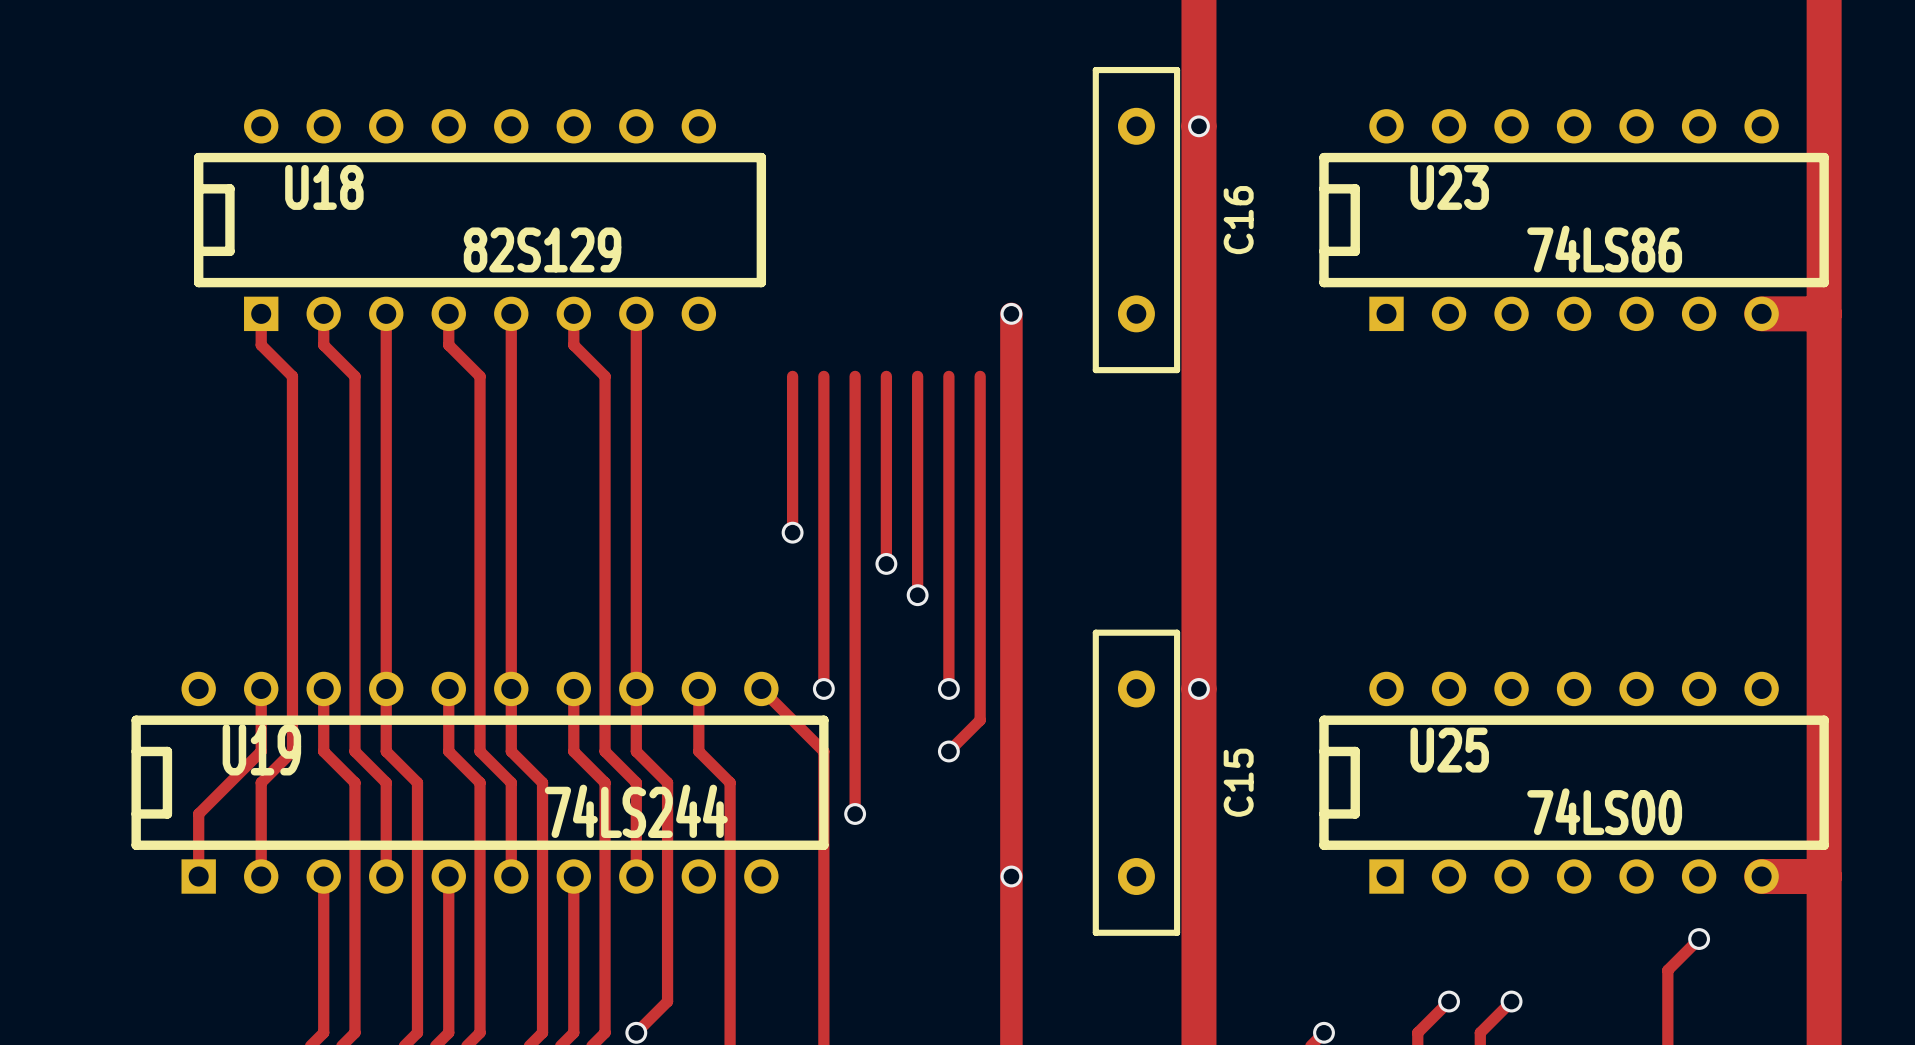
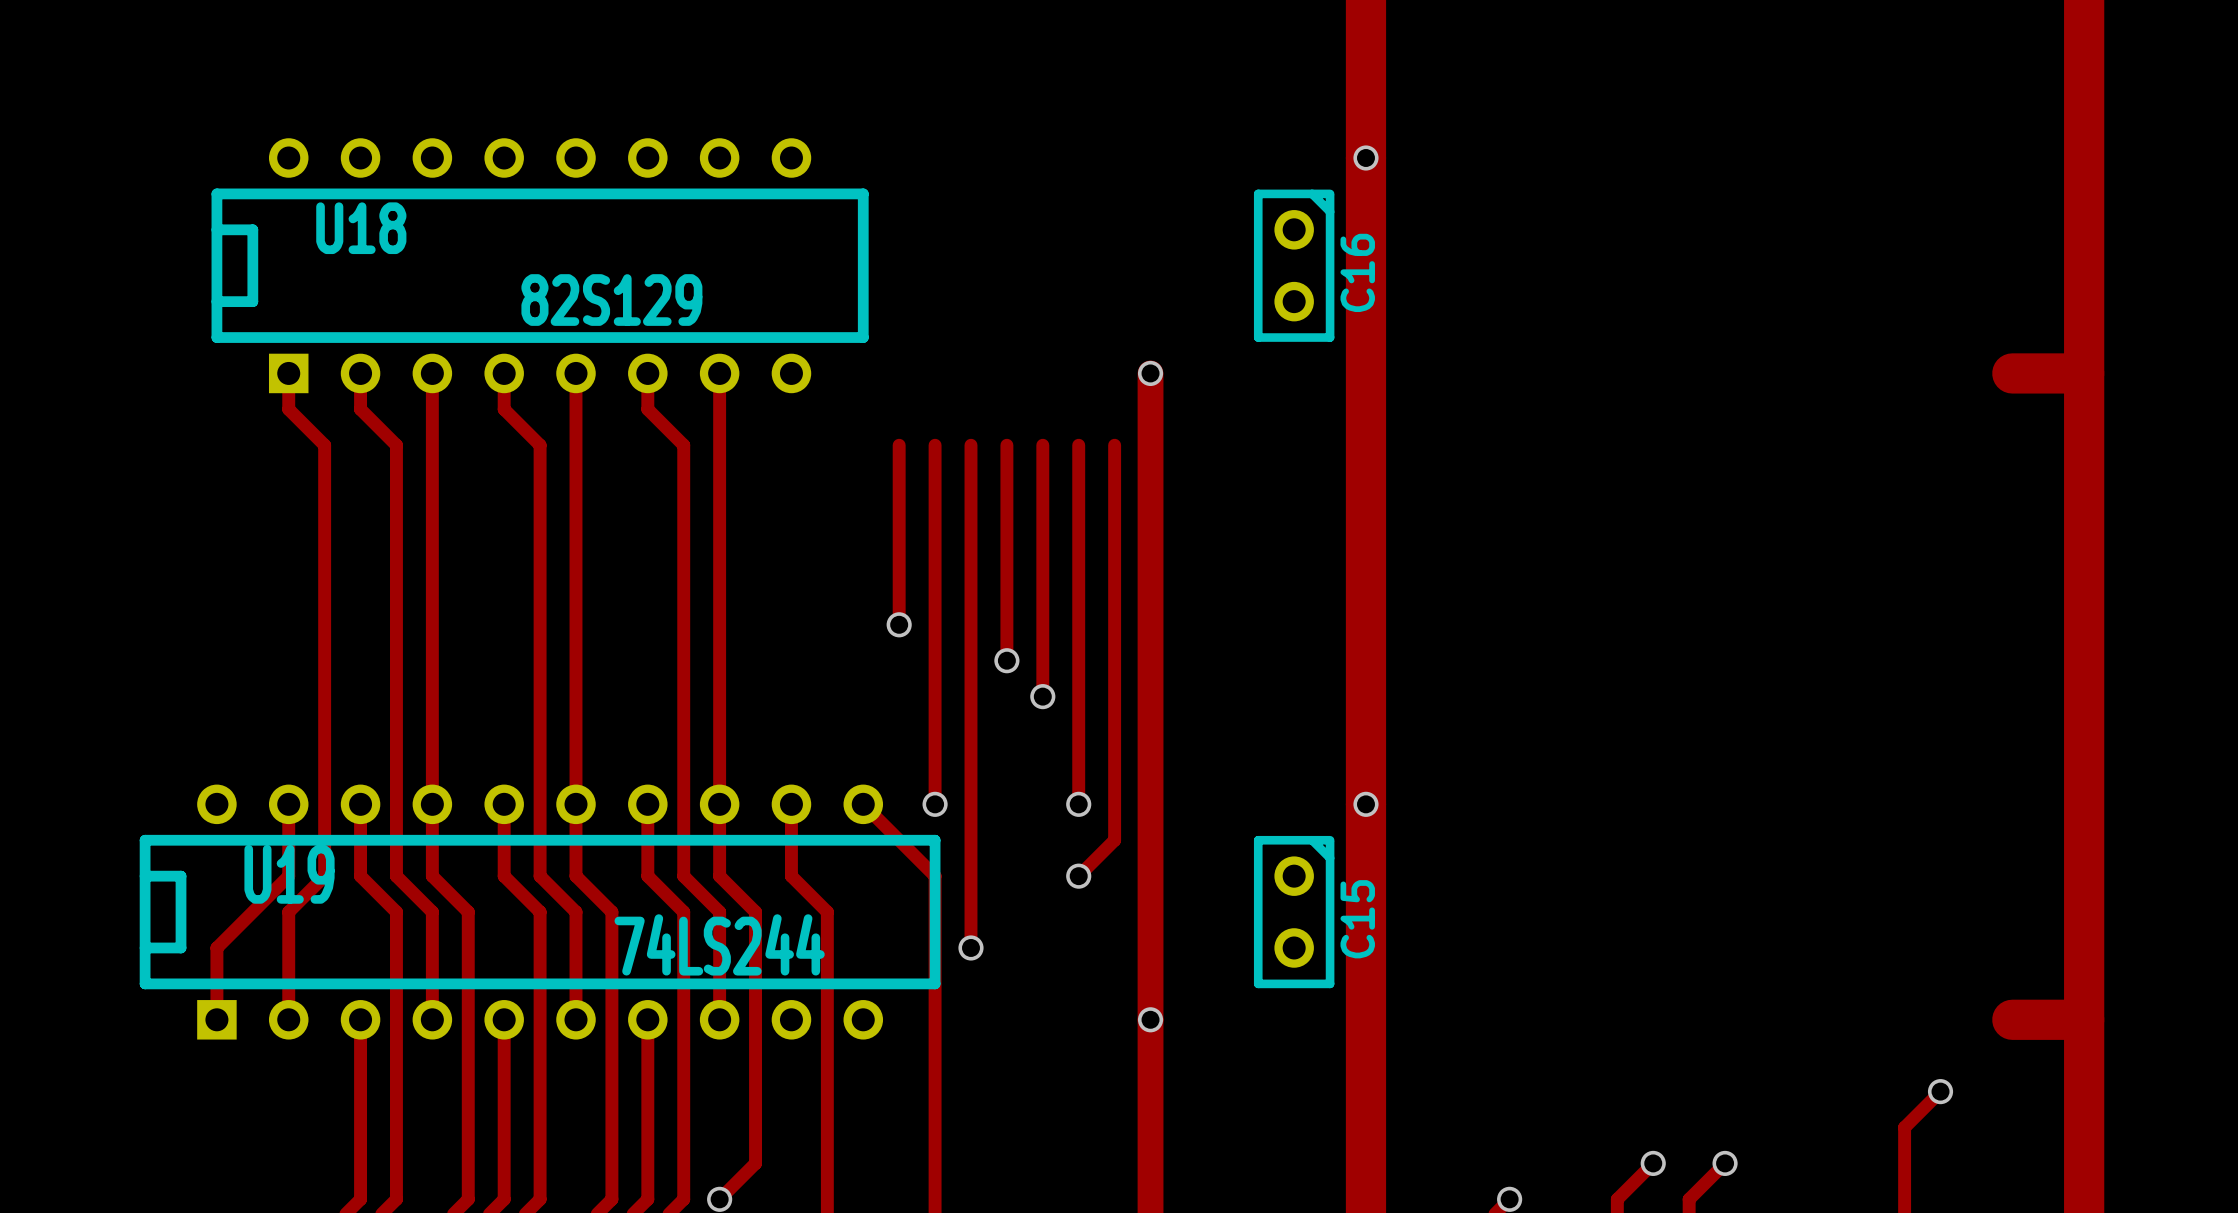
C16 footprint: [1092, 66, 1181, 374] -> [1253, 189, 1335, 342]
U23: 74LS86 (1574, 220) -> none
C15 footprint: [1092, 629, 1181, 936] -> [1253, 835, 1335, 989]
U25: 74LS00 (1574, 782) -> none

